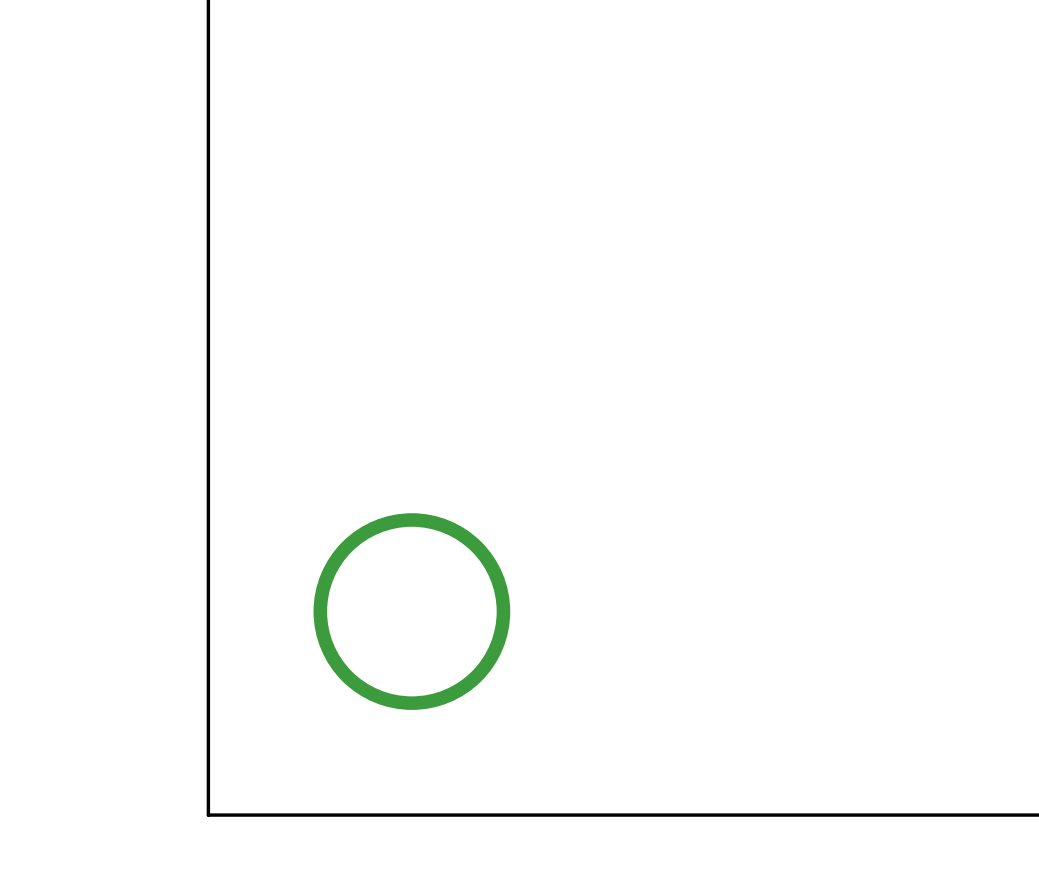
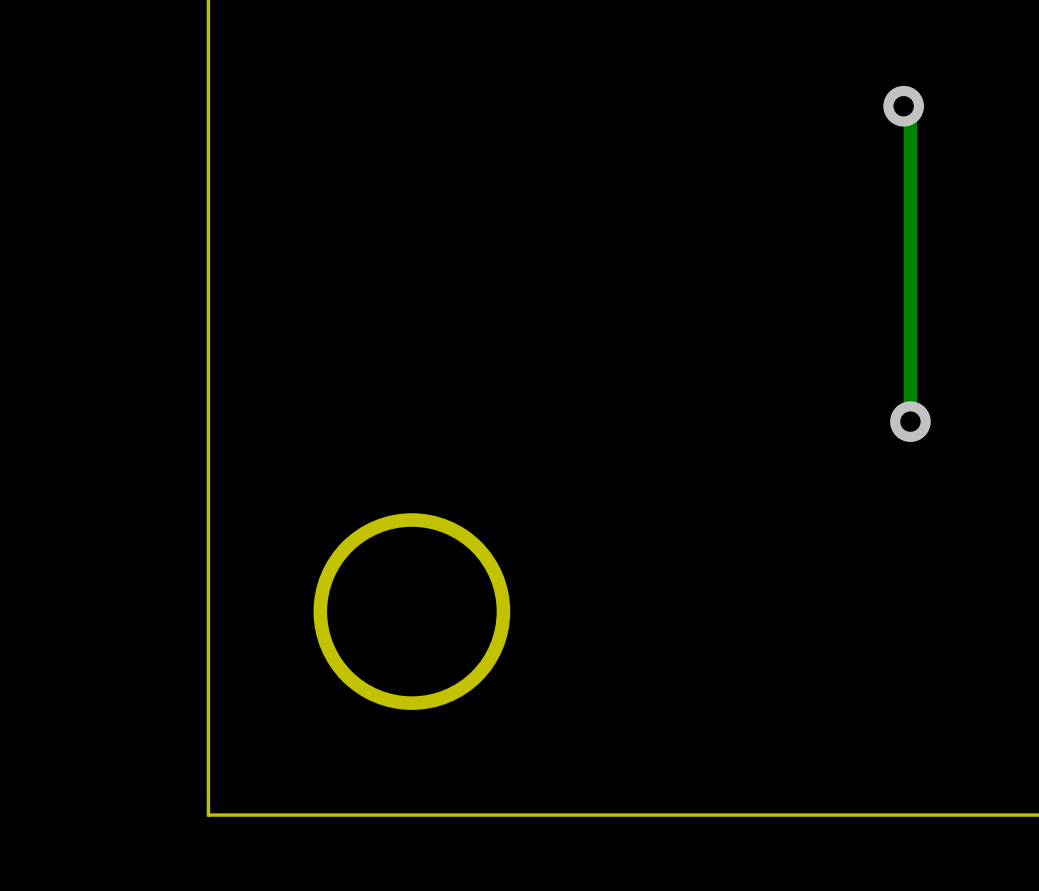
track: none -> (903, 106) (910, 113) (910, 421)
via: none -> (903, 106)
via: none -> (910, 421)

